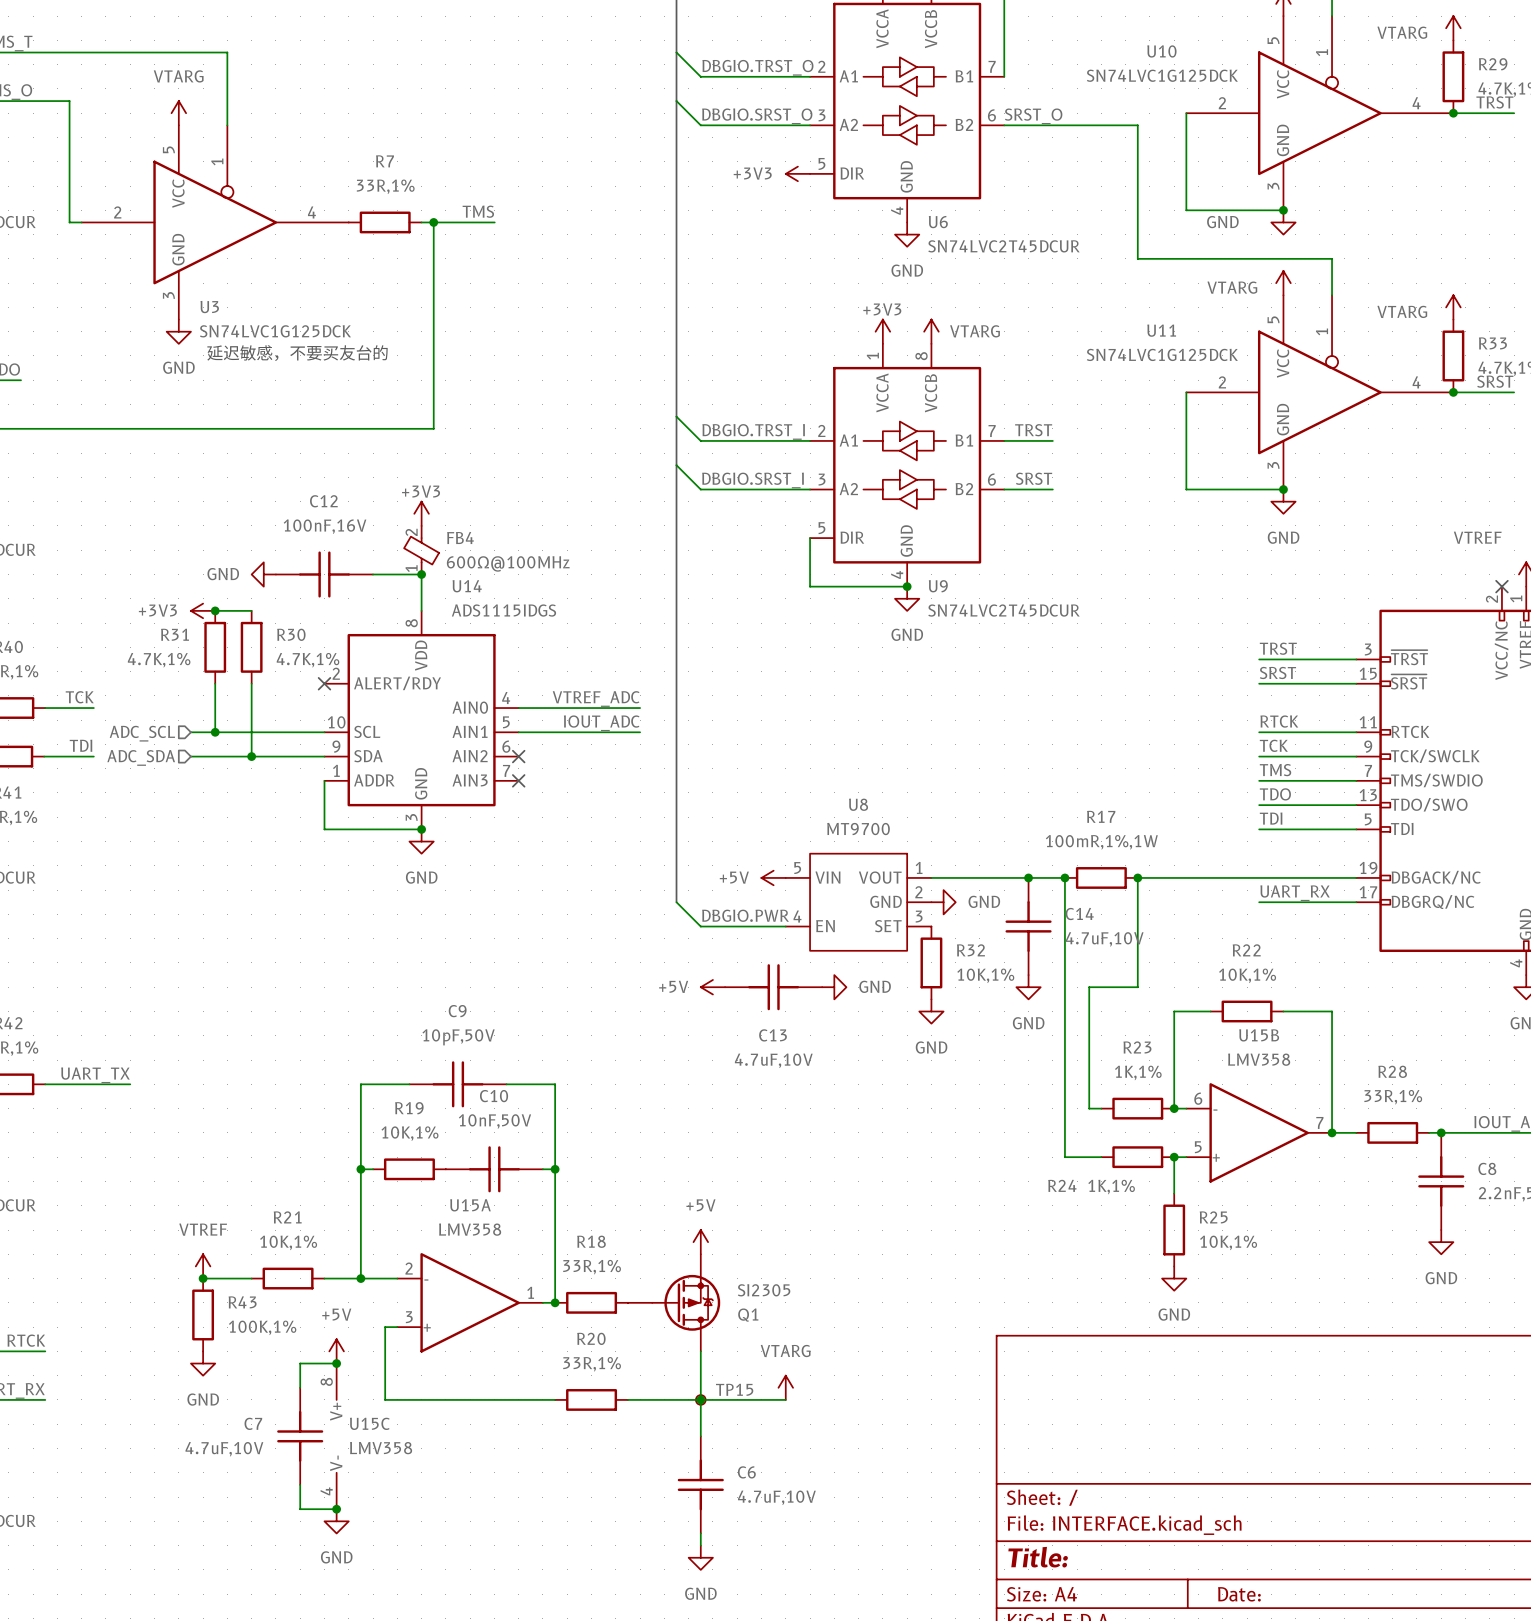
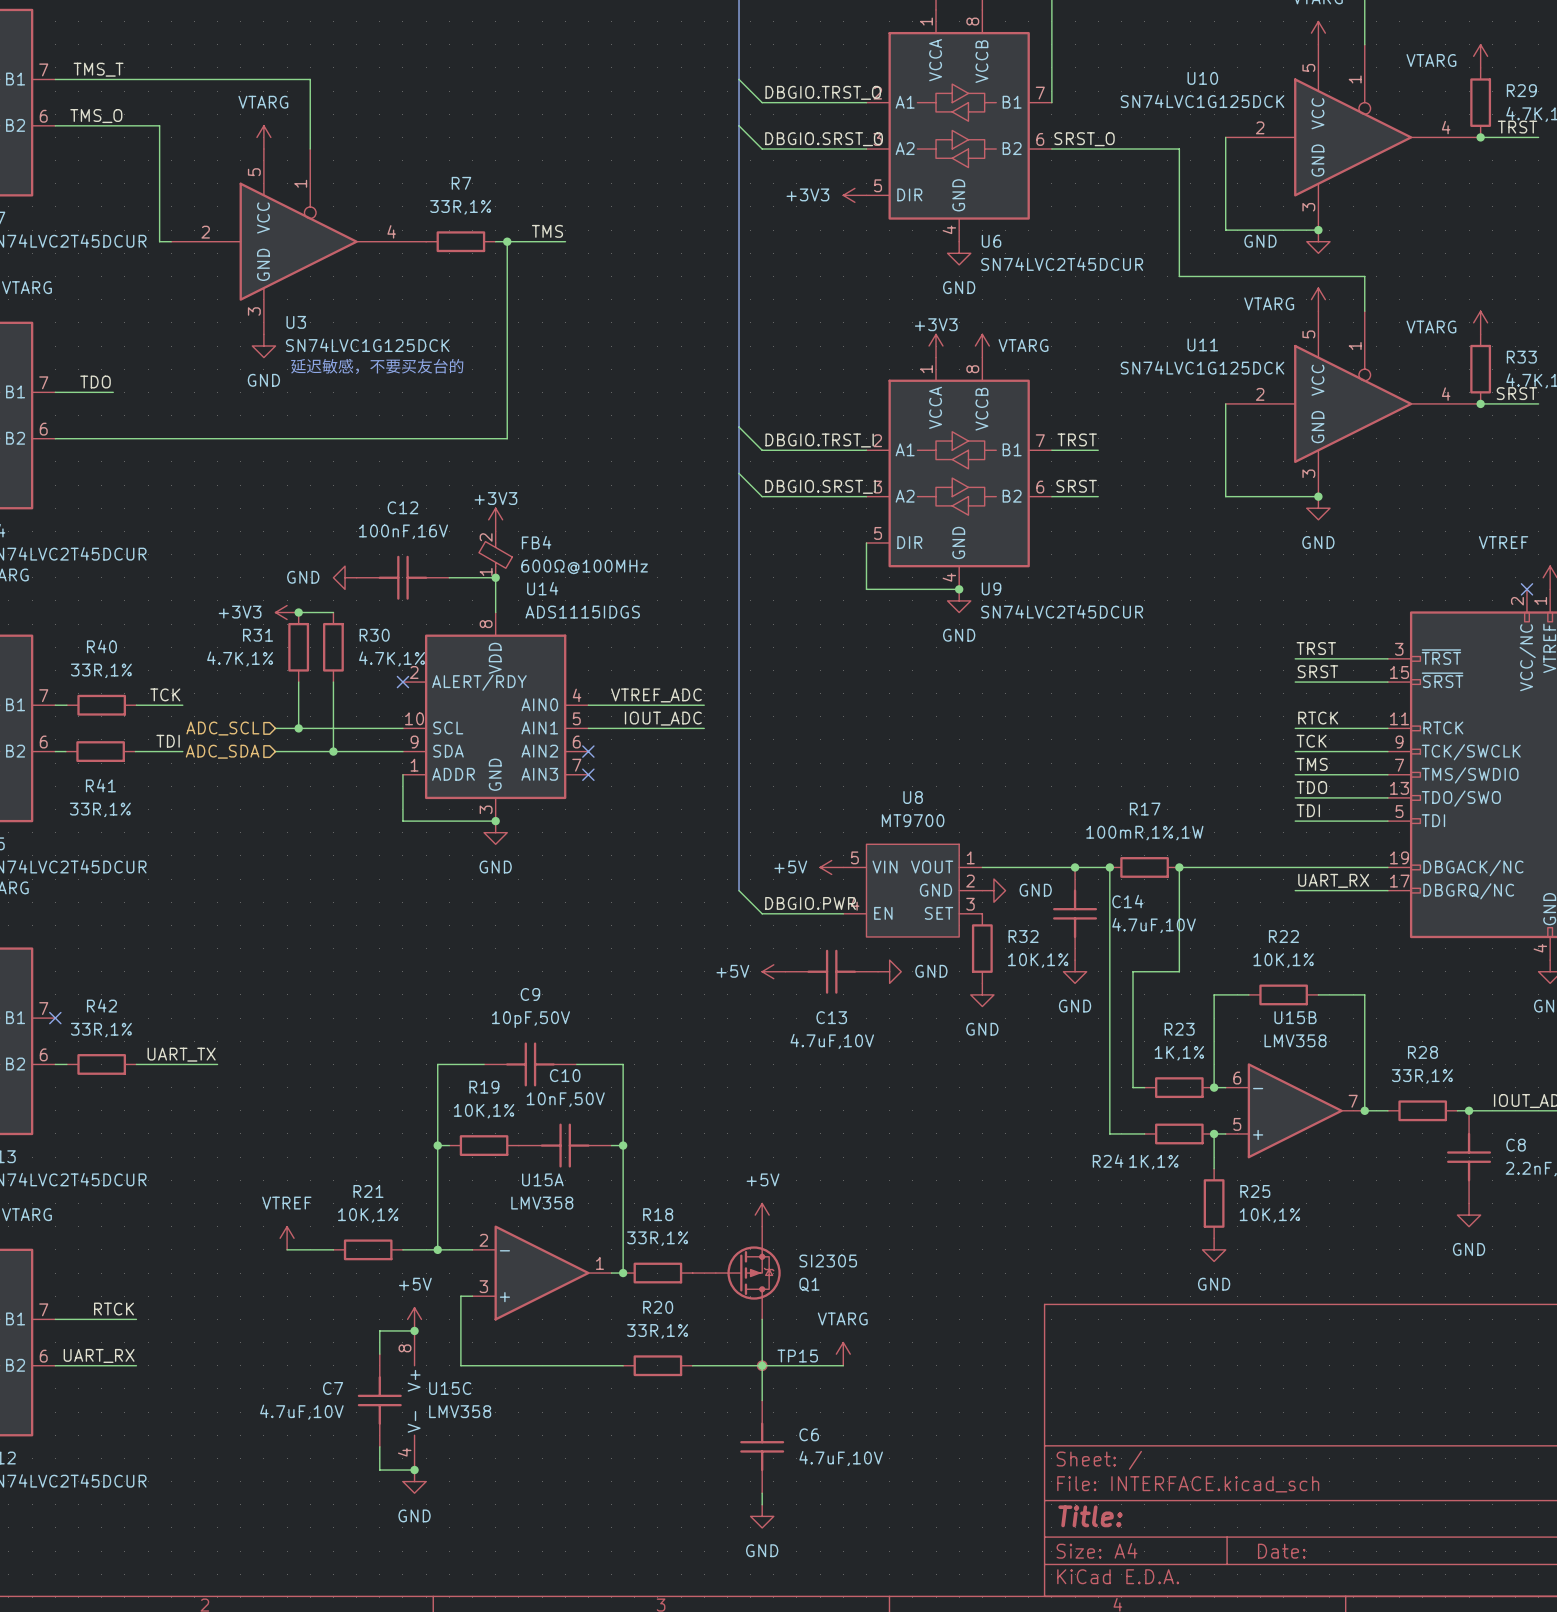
junction: (203, 1278) -> none
R43: 100K,1% (203, 1314) -> none
power symbol: GND (203, 1363) -> none

